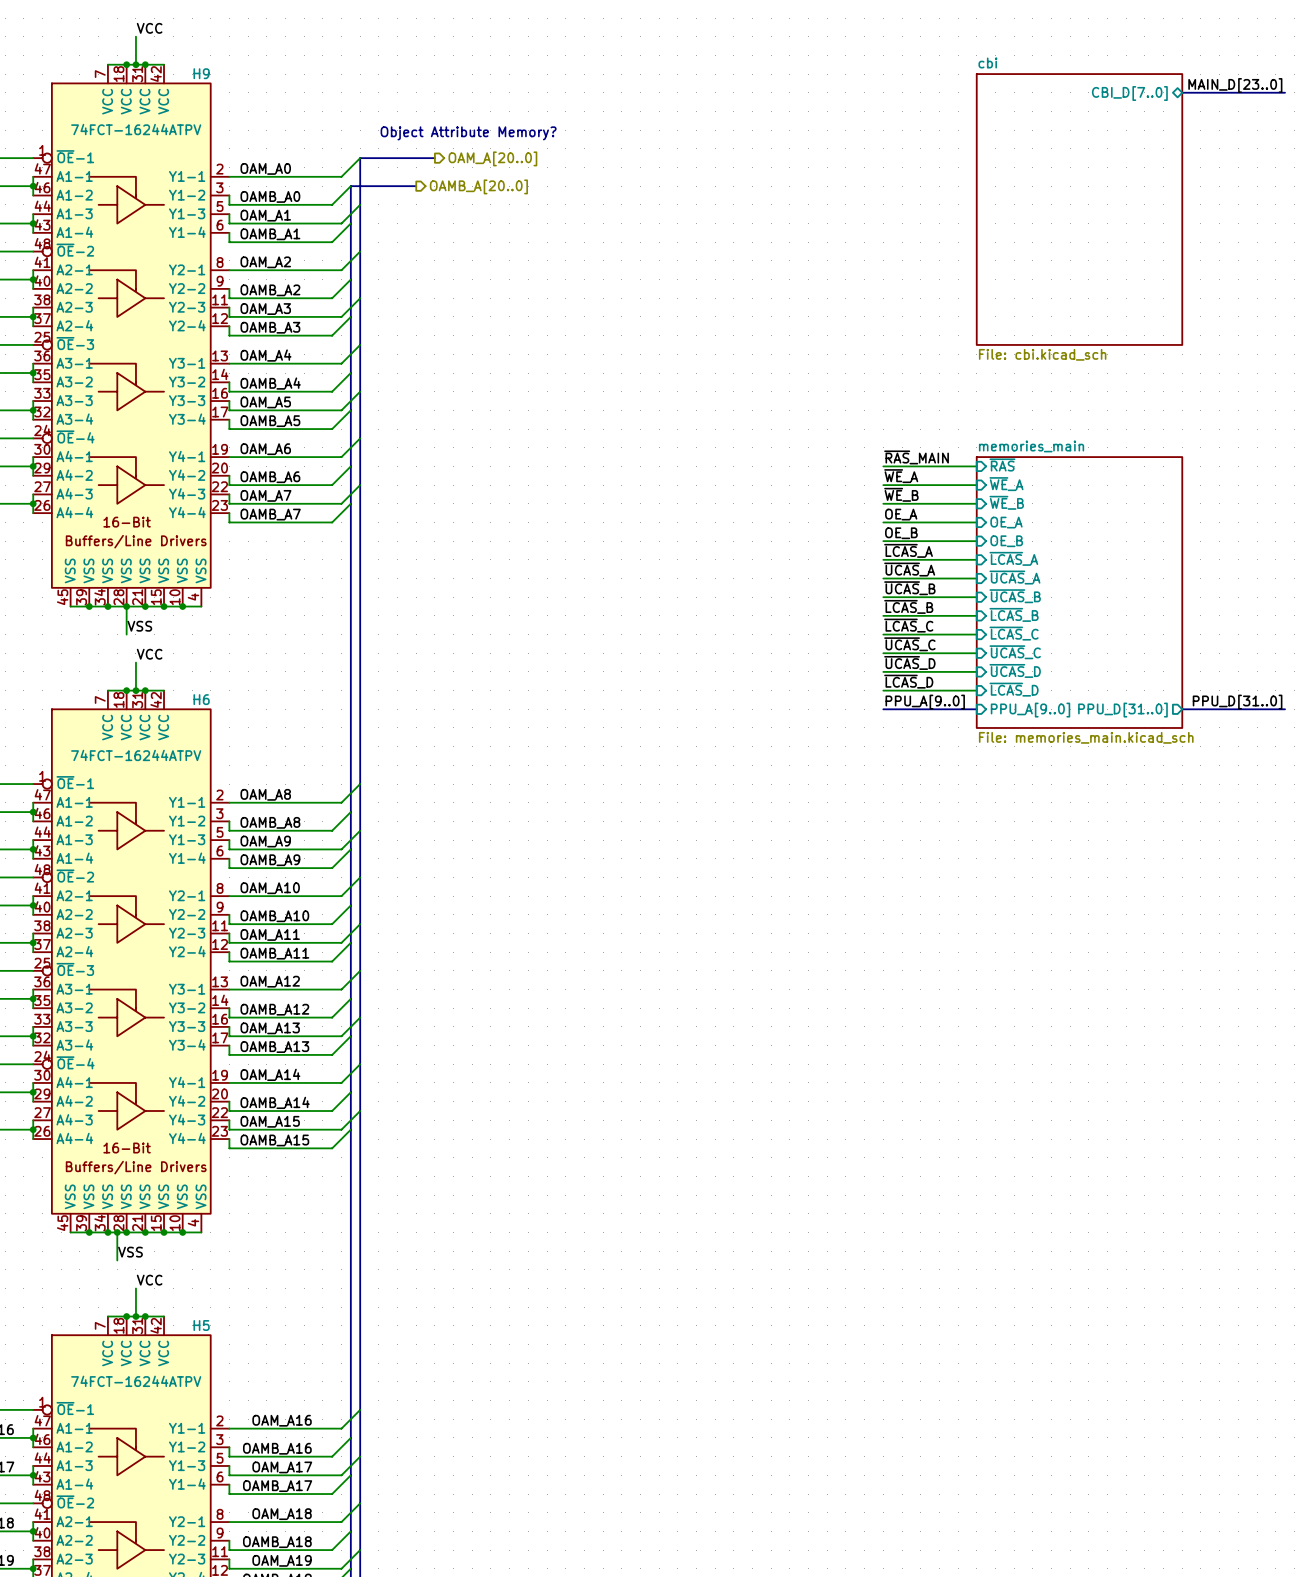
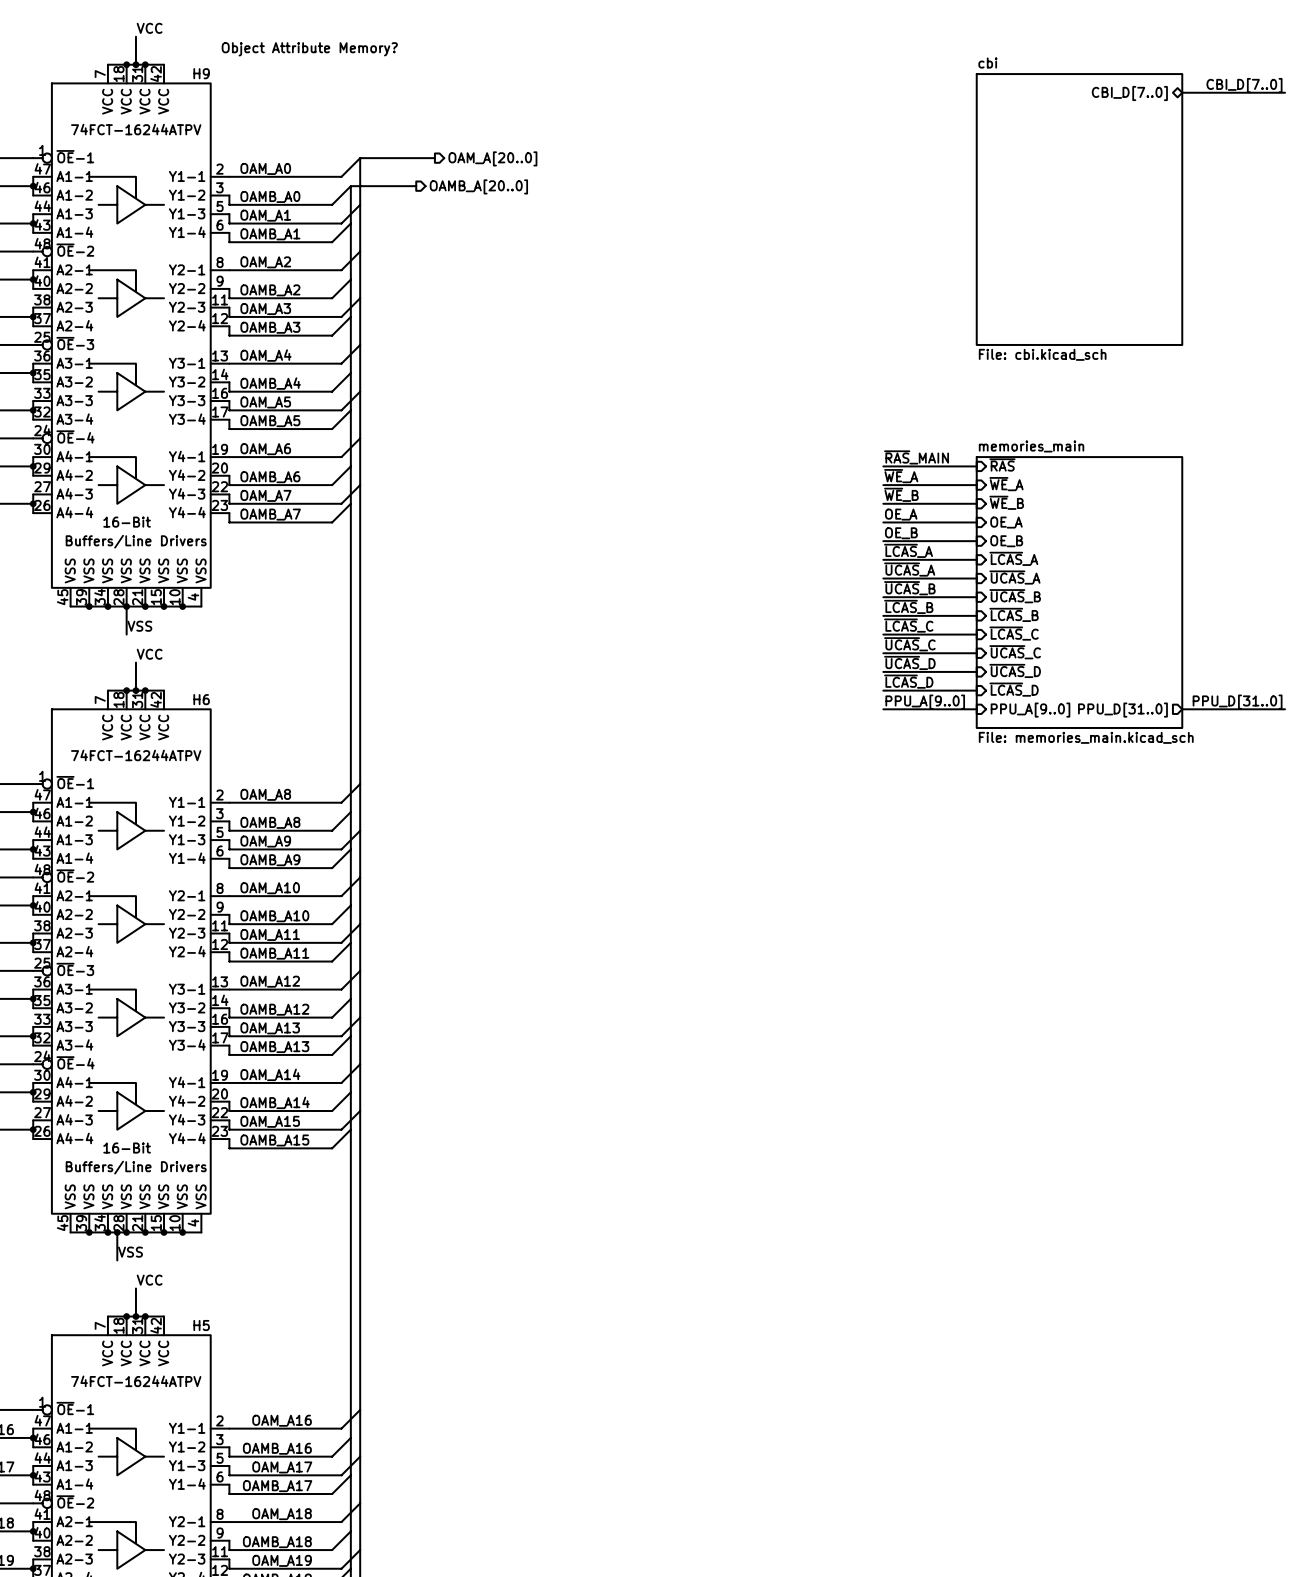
label: MAIN_D[23..0] (1235, 85) -> CBI_D[7..0] (1244, 85)
text position: Object Attribute Memory? (468, 133) -> Object Attribute Memory? (309, 49)

